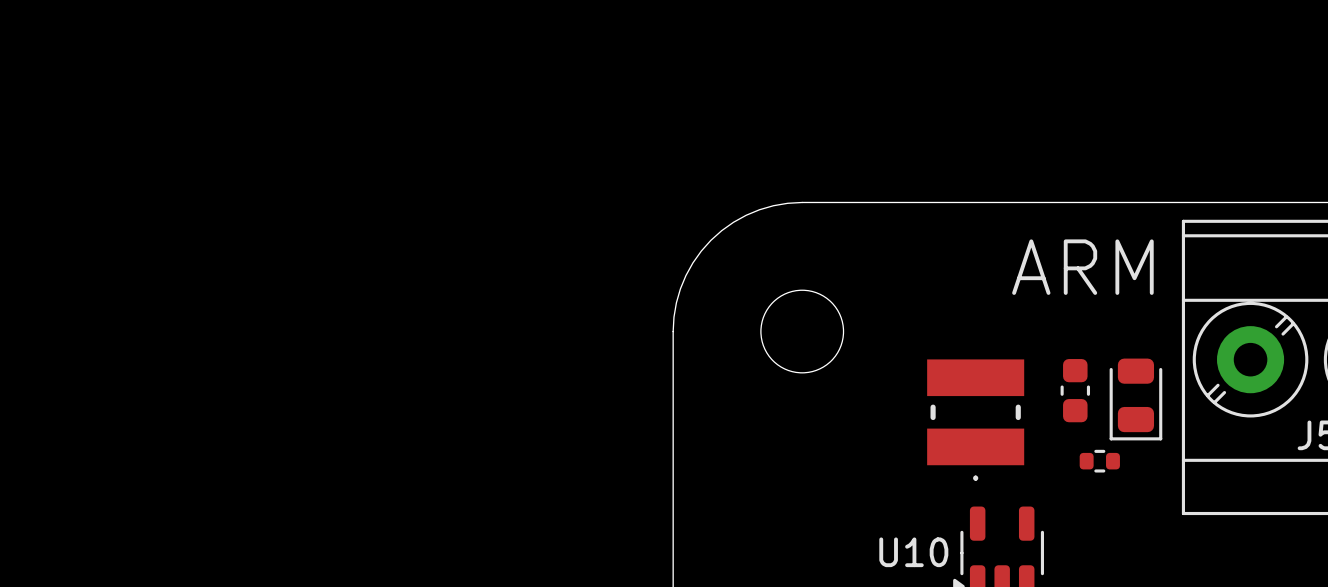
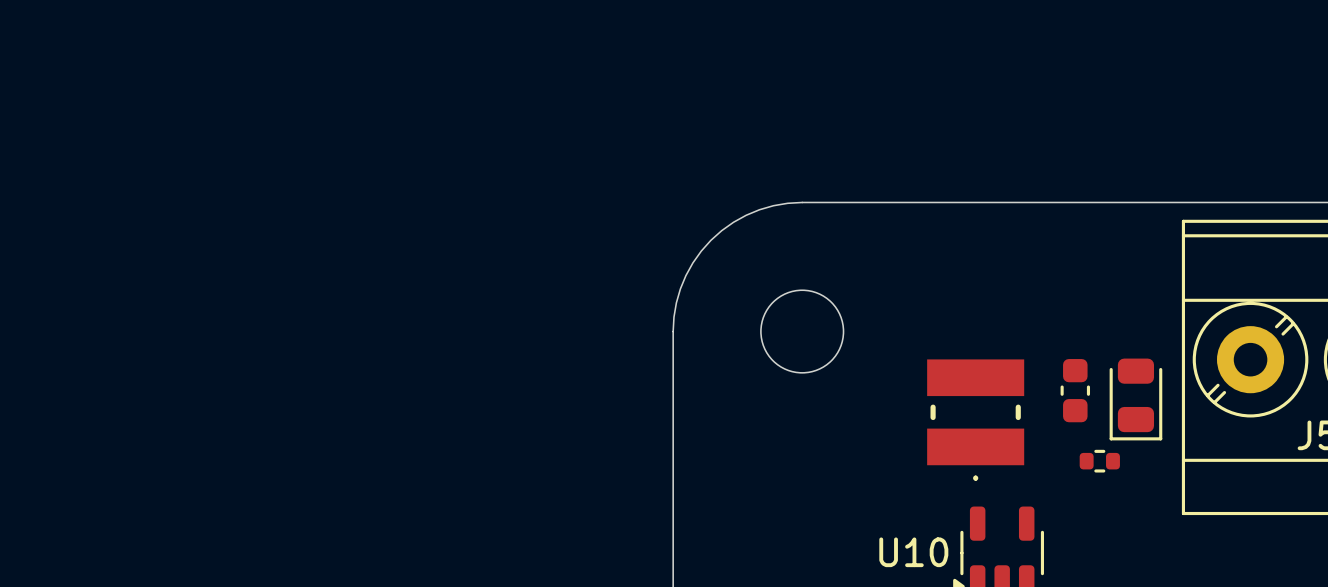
text: ARM (1082, 267) -> none

